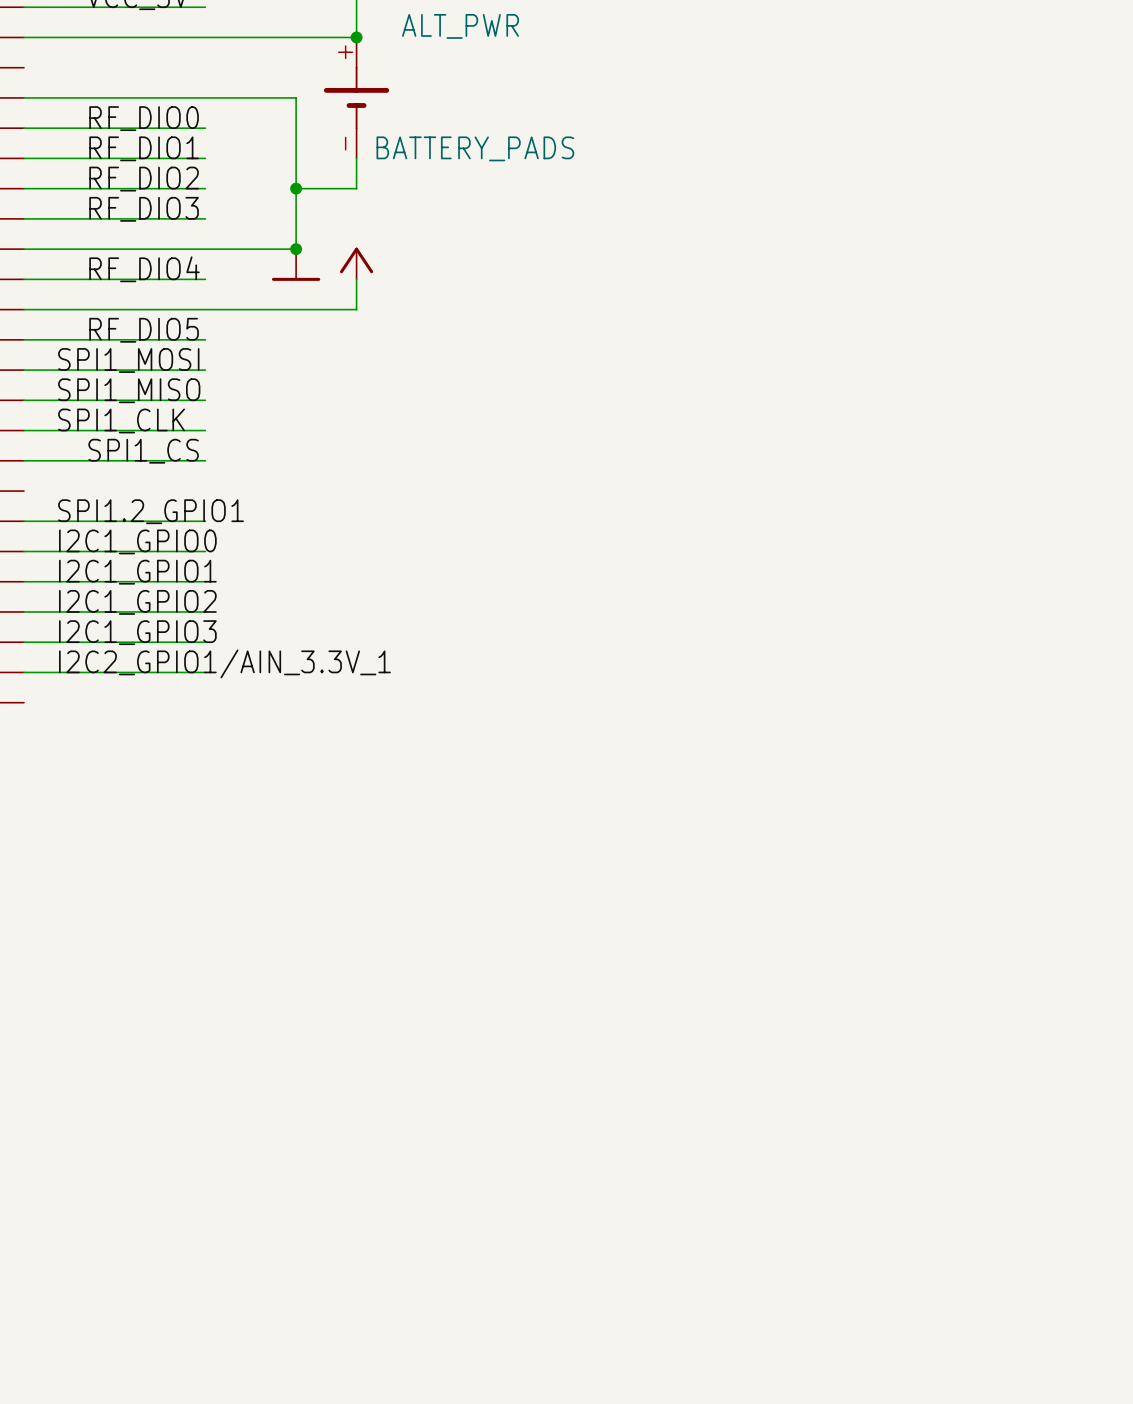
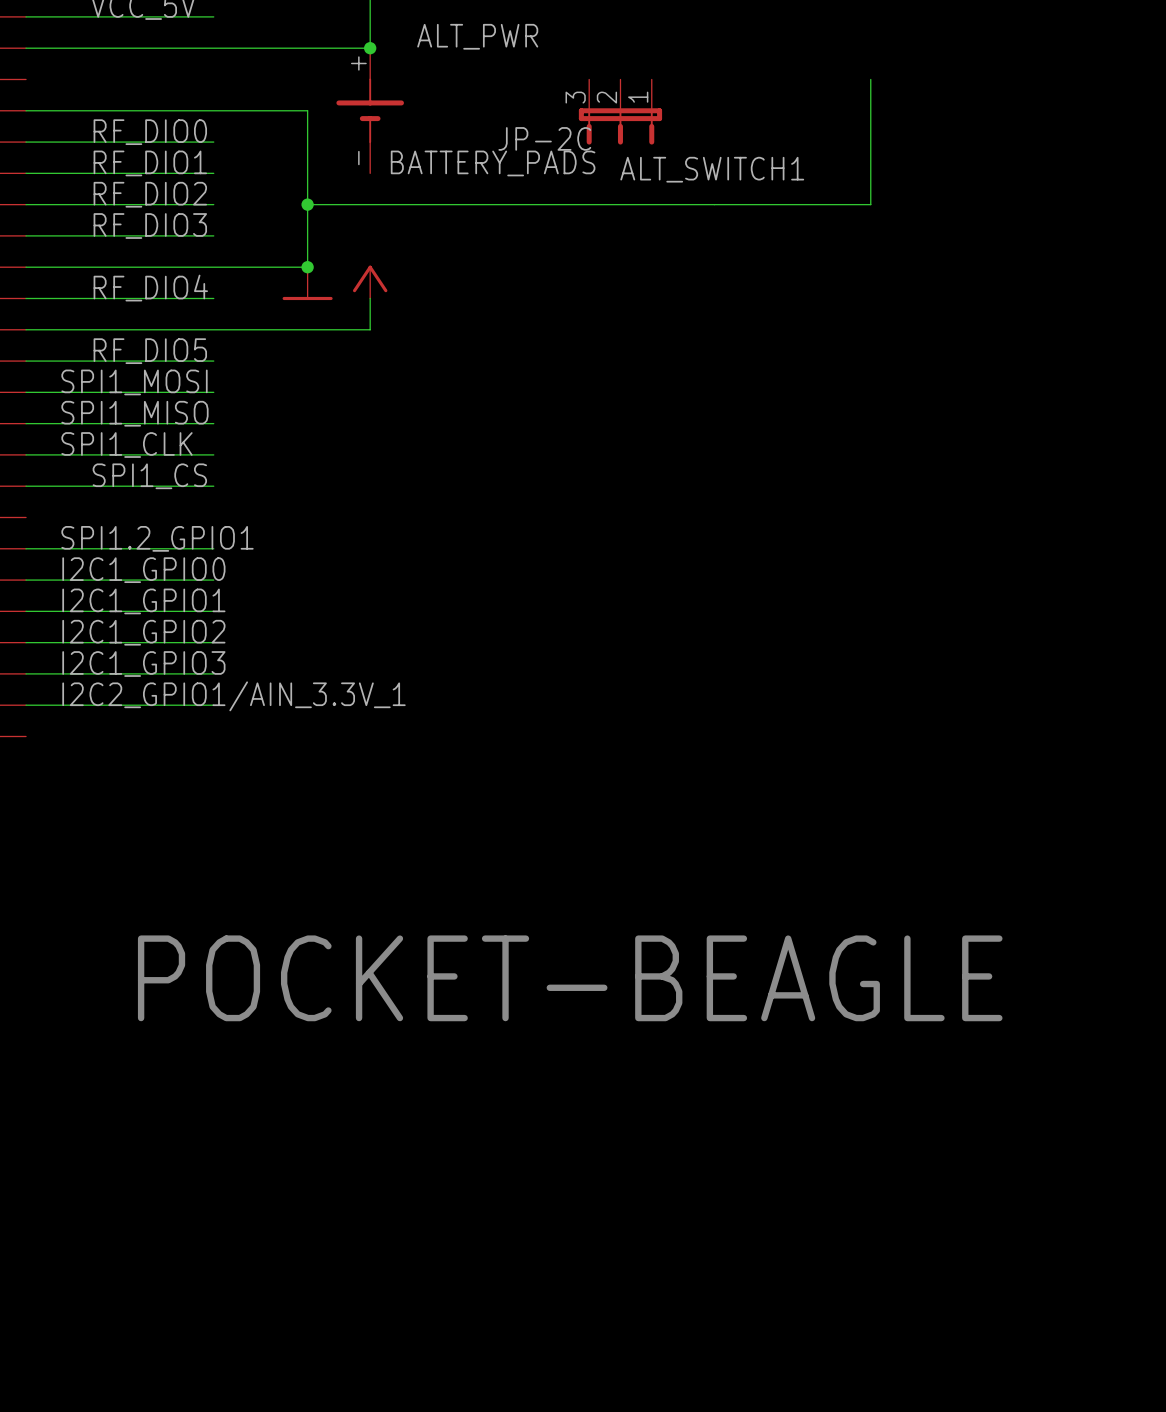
ALT_SWITCH1: none -> JP-2C (620, 112)
wire: (356, 158) (356, 188) -> (870, 79) (870, 204) (370, 204)
text: none -> POCKET-BEAGLE (570, 978)

